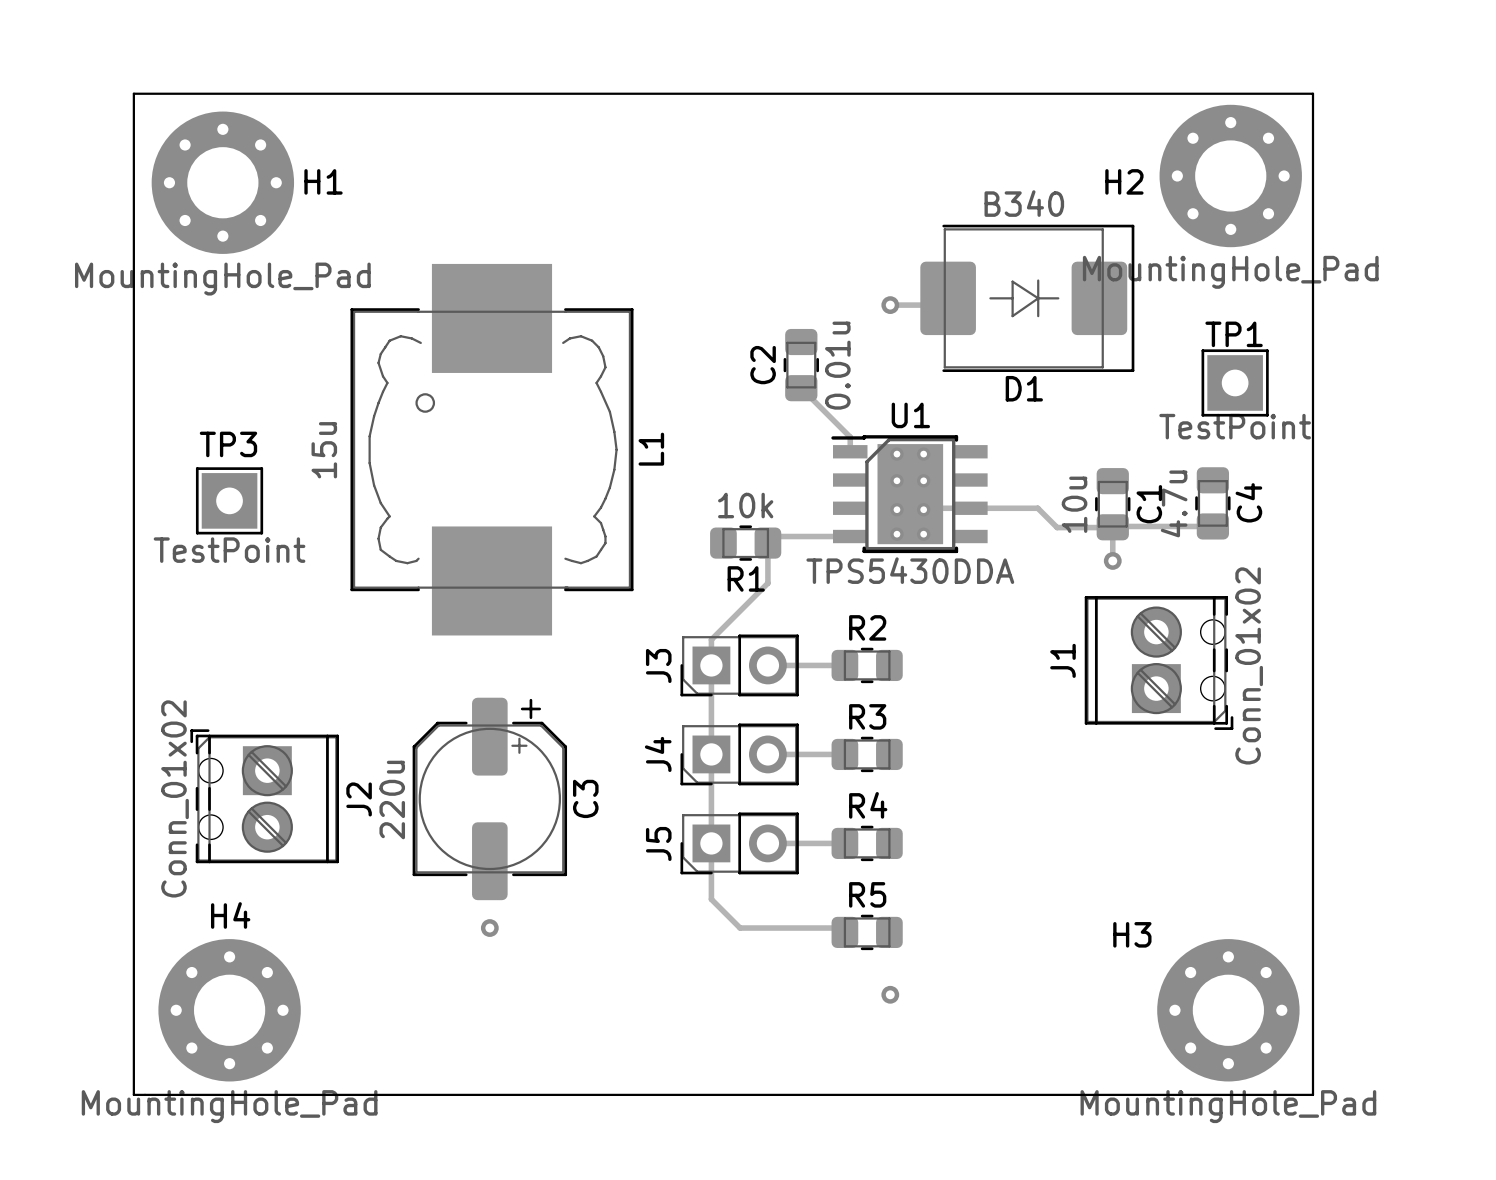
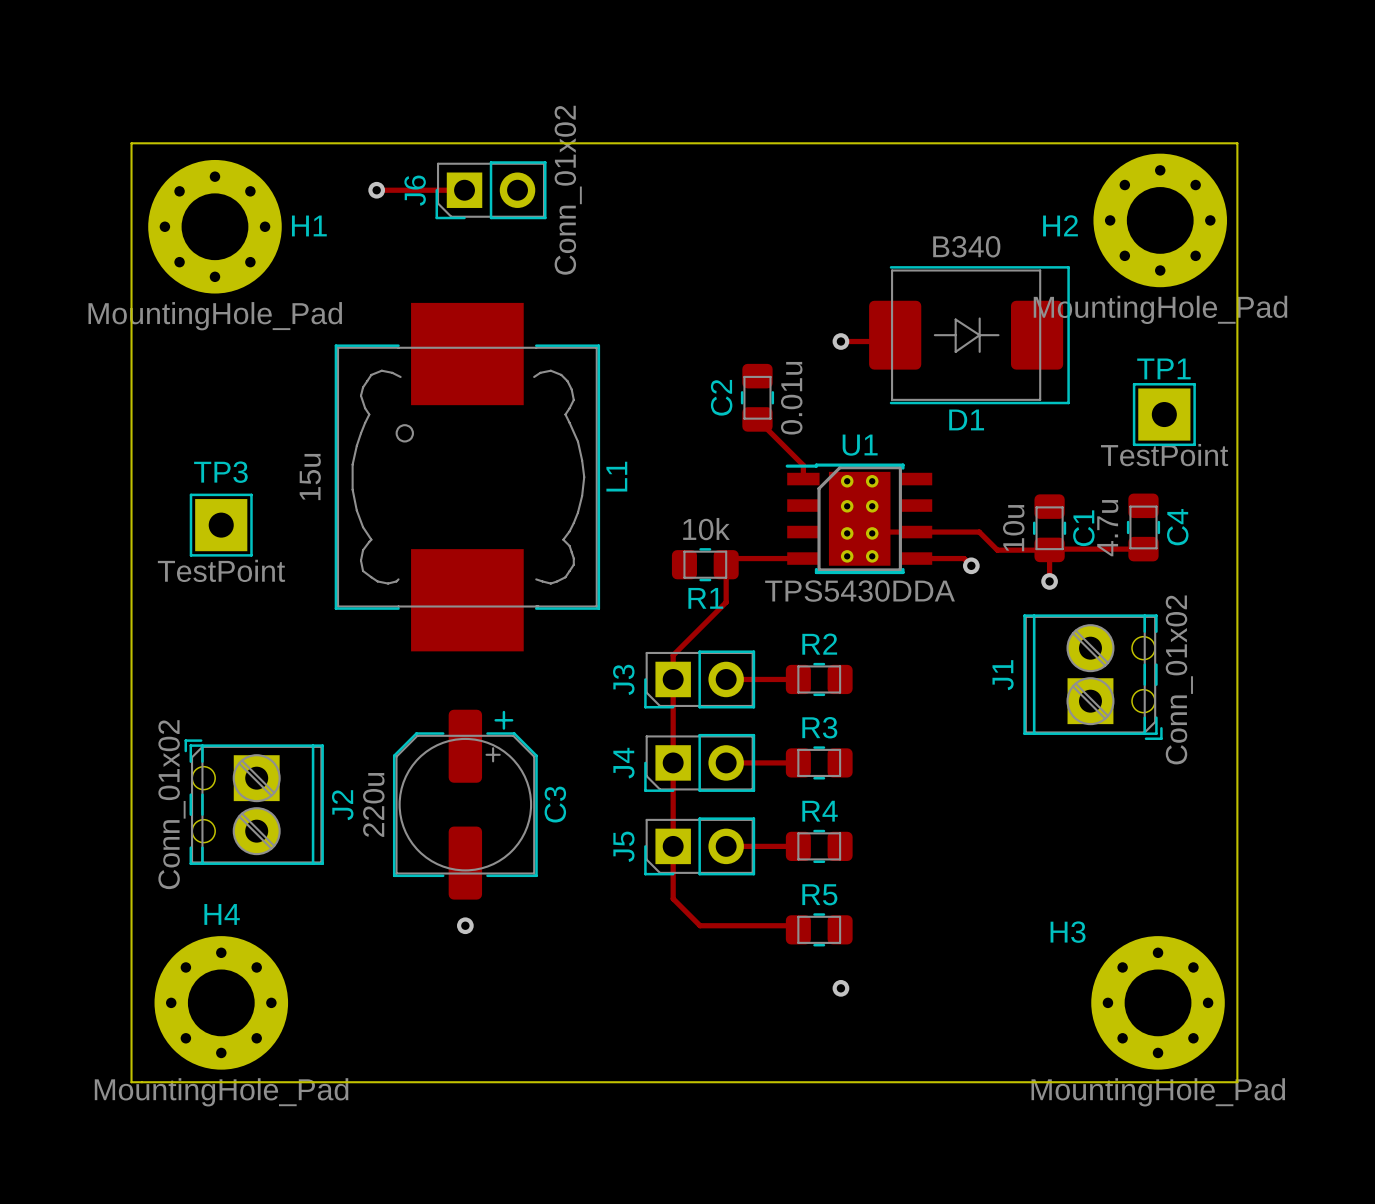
track: none -> (376, 190) (464, 190)
via: none -> (376, 190)
J6: none -> Conn_01x02 (491, 190)
track: none -> (916, 558) (964, 558) (971, 565)
via: none -> (971, 565)

